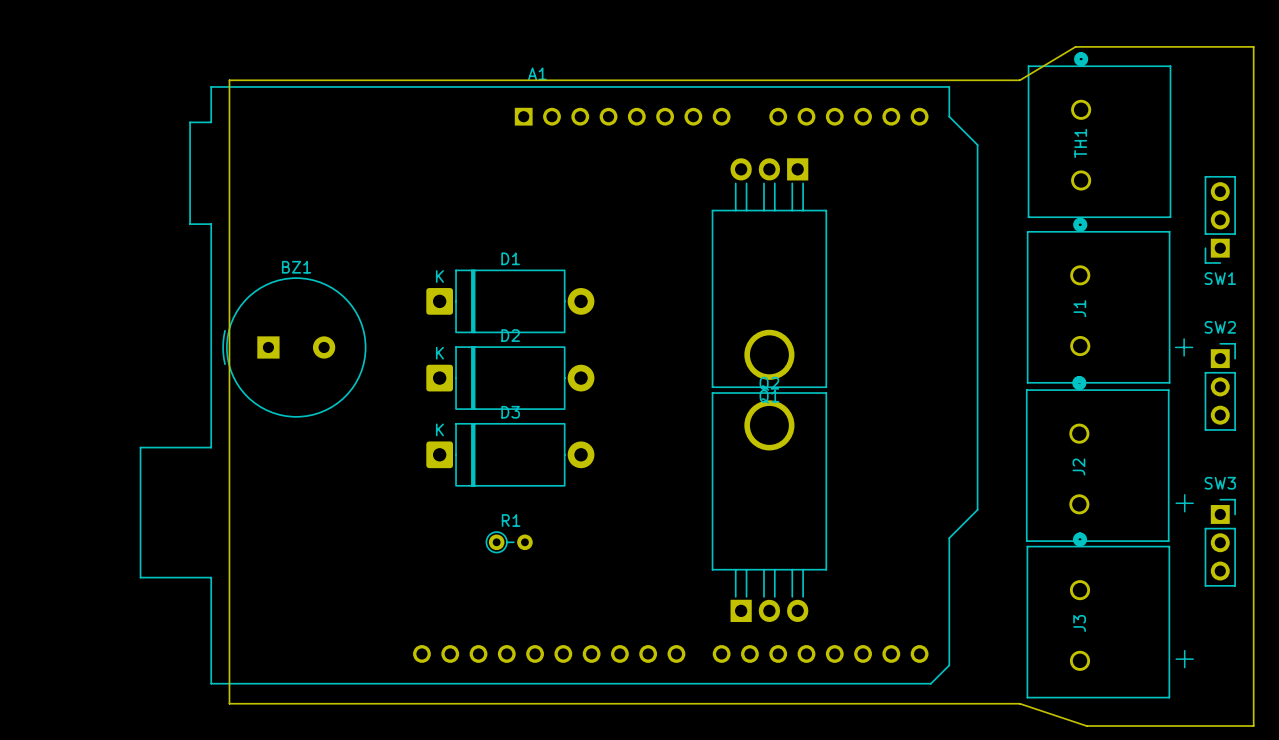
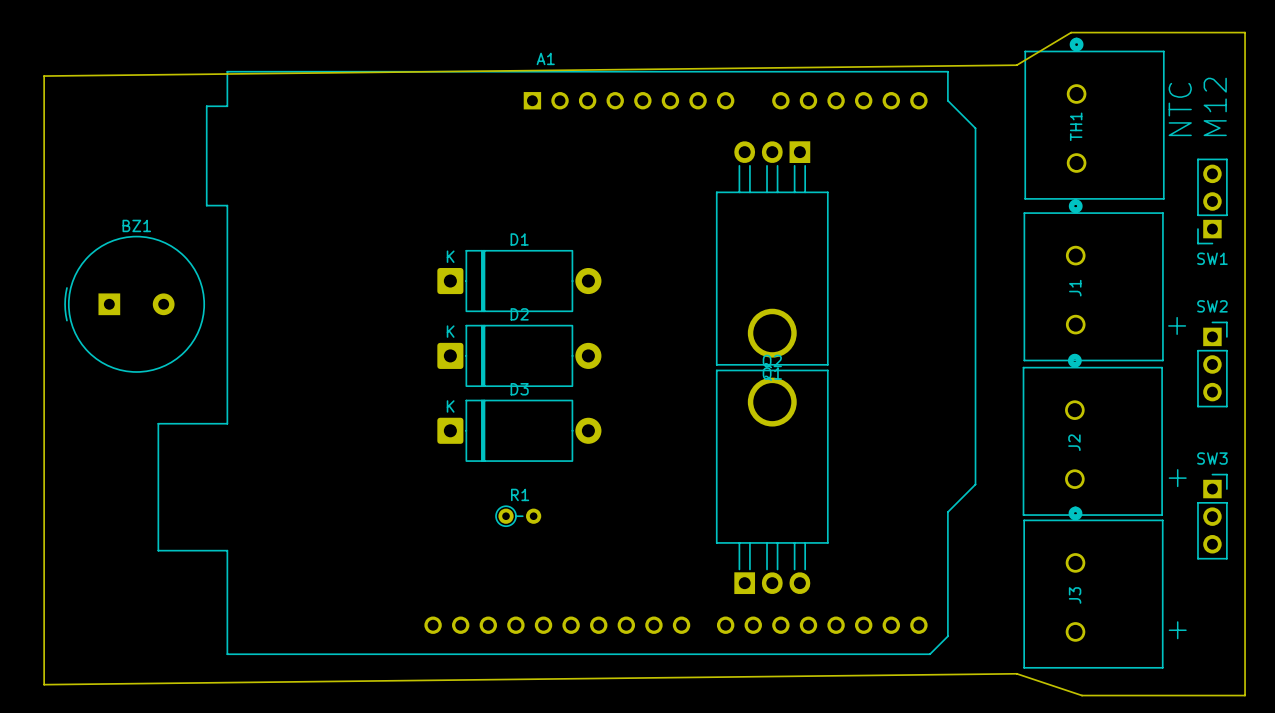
board edge: (1019, 80) (229, 80) (229, 703) (1019, 703) -> (1016, 65) (44, 76) (44, 684) (1016, 673)
text: none -> M12 (1215, 106)
text: none -> NTC (1180, 109)
BZ1 position: (294, 347) -> (134, 304)

